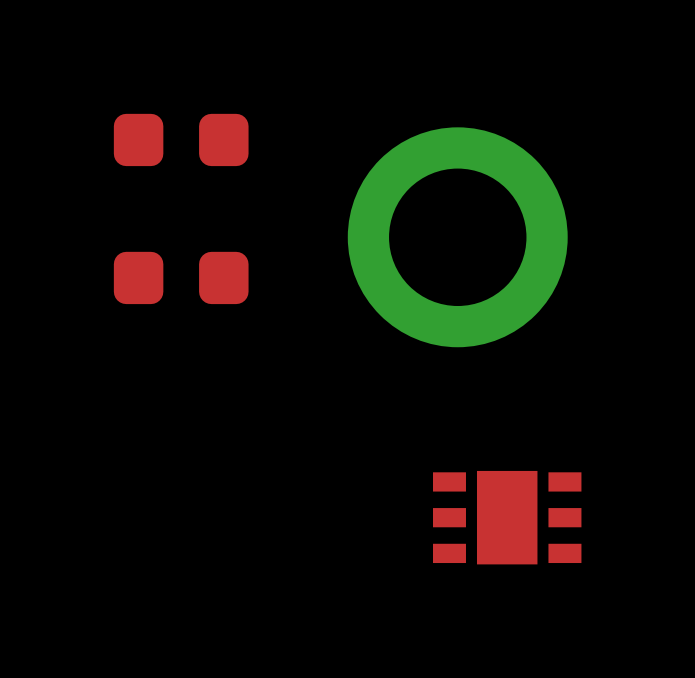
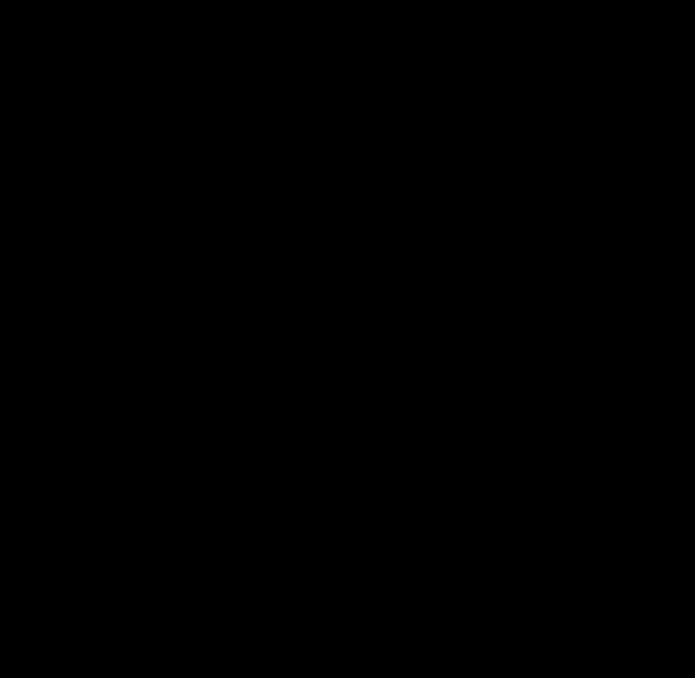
part: (181, 139) -> none
part: (457, 237) -> none
part: (181, 277) -> none
part: (507, 517) -> none

